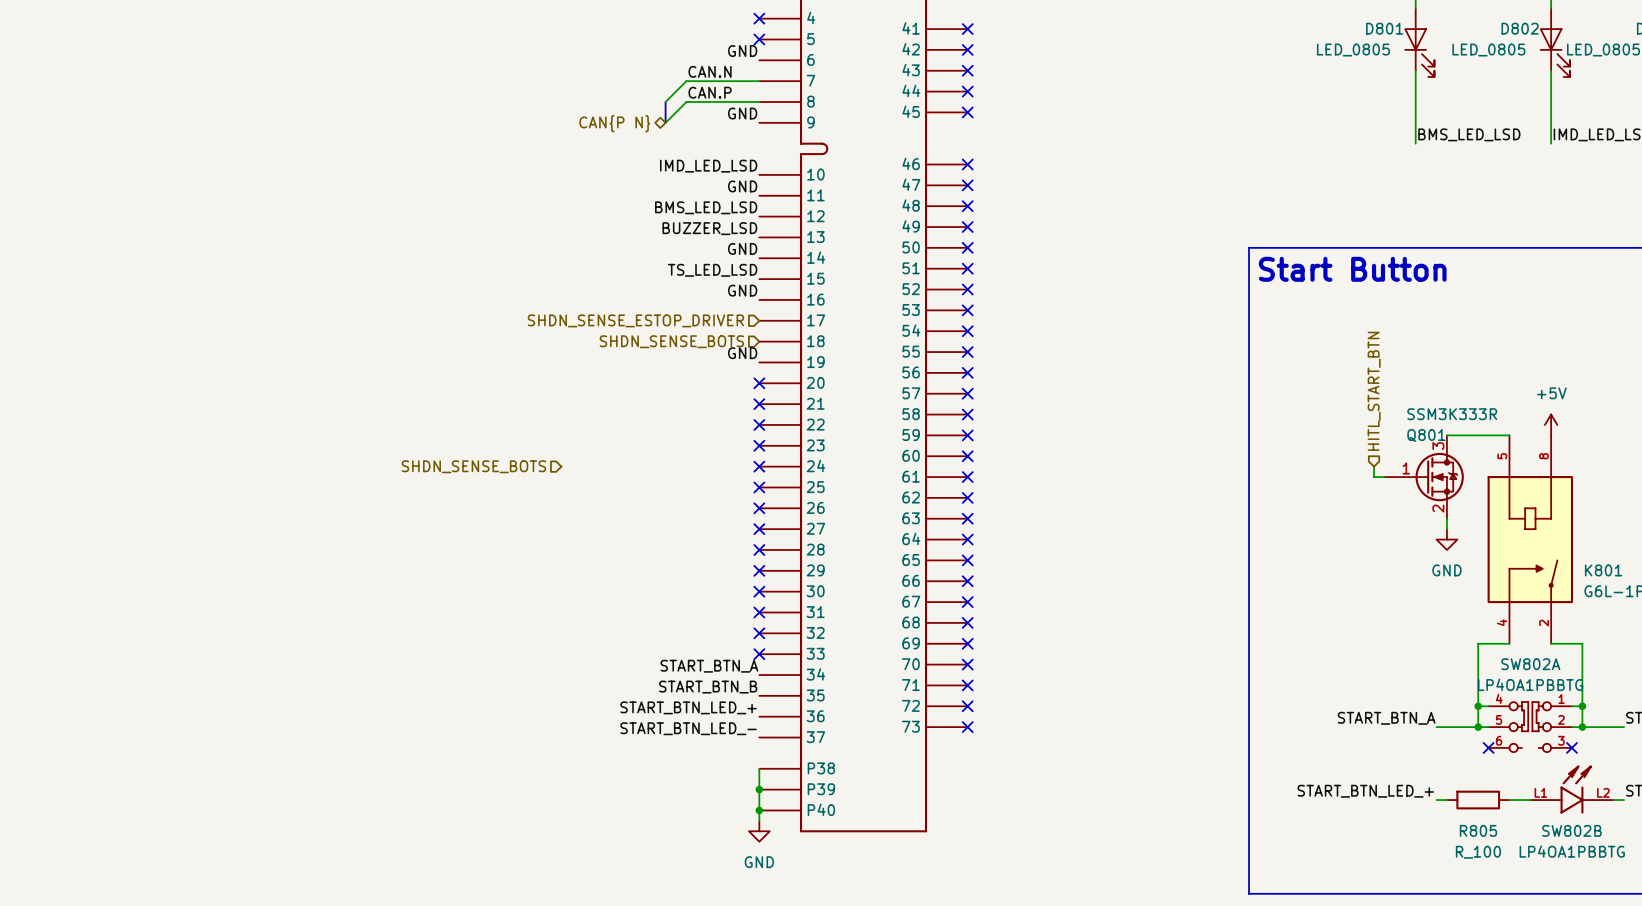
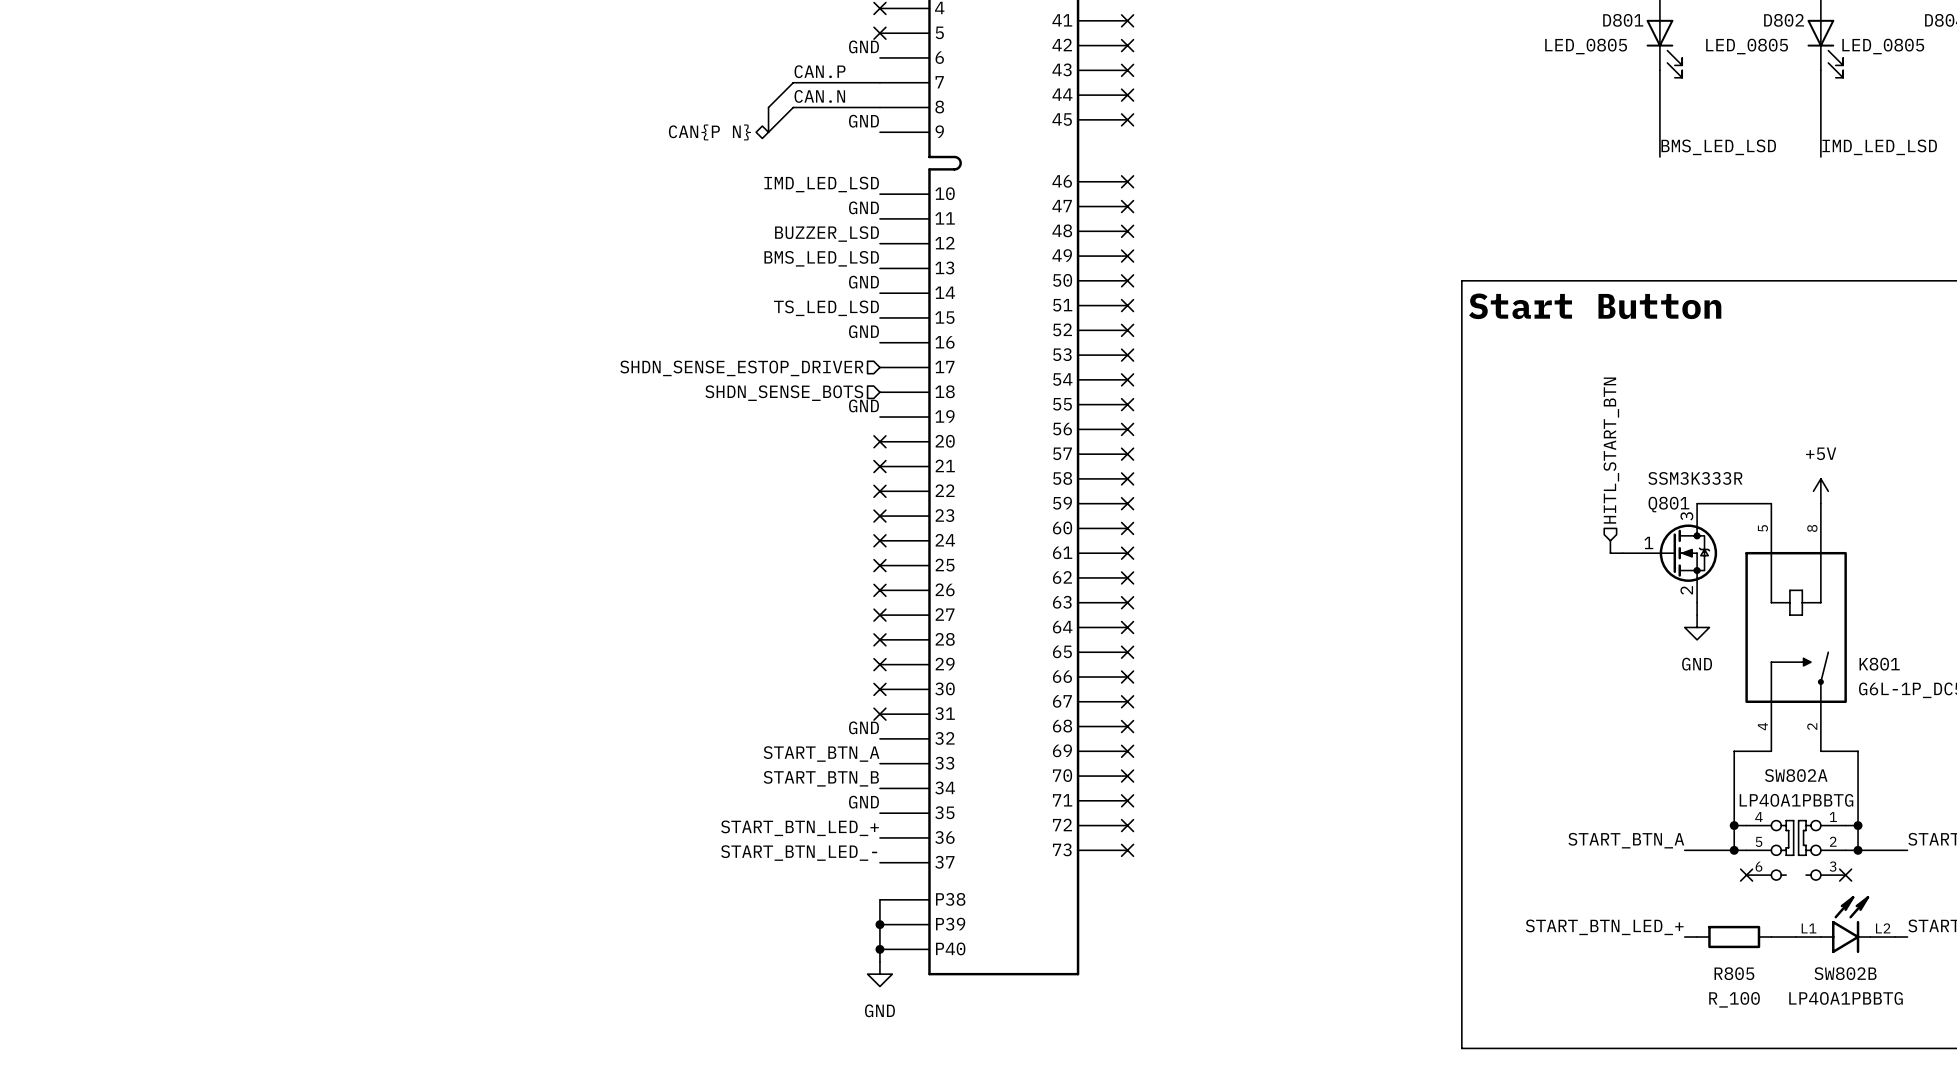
label: CAN.N (710, 71) -> CAN.P (820, 71)
label: CAN.P (710, 92) -> CAN.N (819, 96)
label: BMS_LED_LSD (706, 207) -> BUZZER_LSD (827, 234)
label: BUZZER_LSD (709, 228) -> BMS_LED_LSD (821, 258)
hierarchical label: SHDN_SENSE_BOTS (473, 466) -> none
label: none -> GND (863, 727)
no-connect mark: (759, 633) -> none
label: none -> START_BTN_A (821, 754)
no-connect mark: (759, 654) -> none
label: START_BTN_A (709, 666) -> START_BTN_B (821, 778)
label: START_BTN_B (708, 687) -> GND (863, 802)

